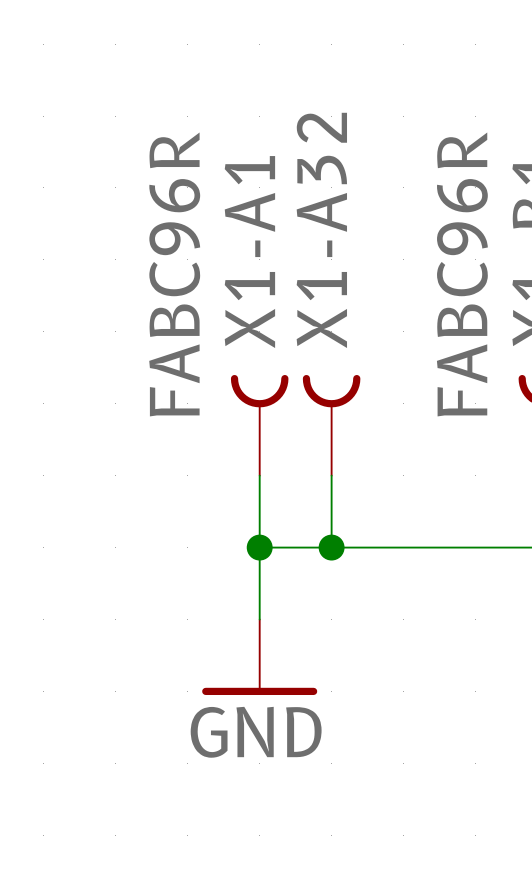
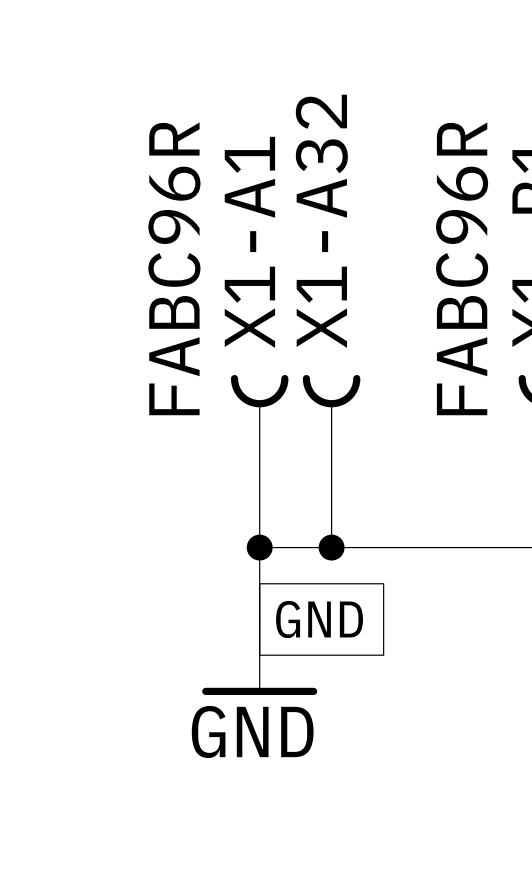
global label: none -> GND (319, 619)

